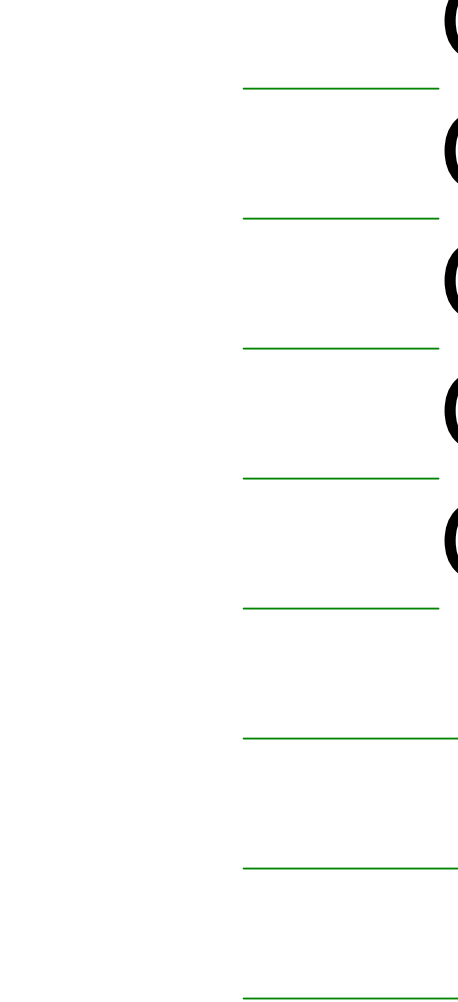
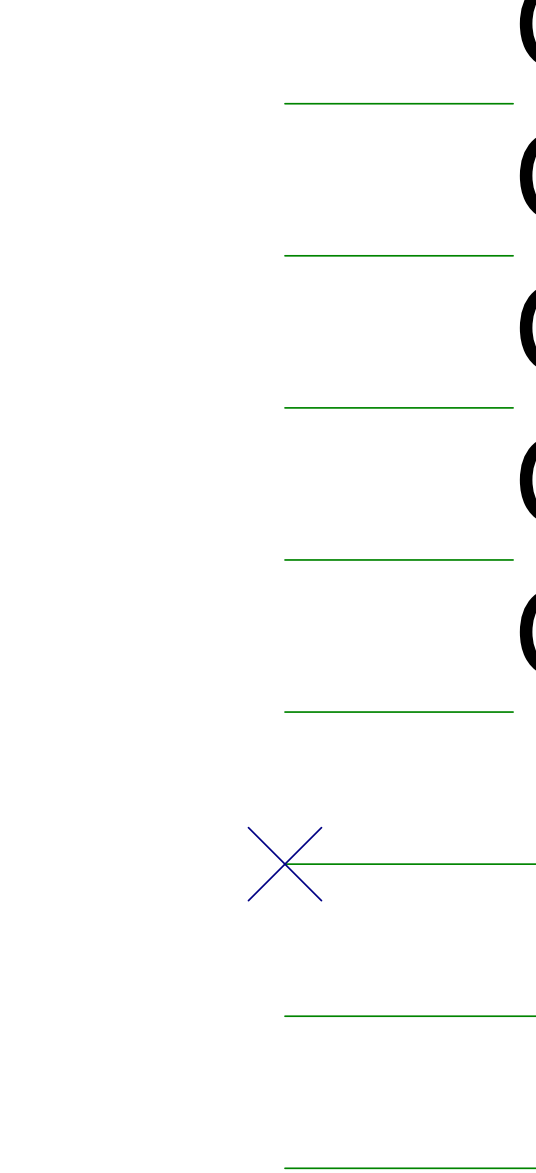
no-connect mark: none -> (284, 864)

